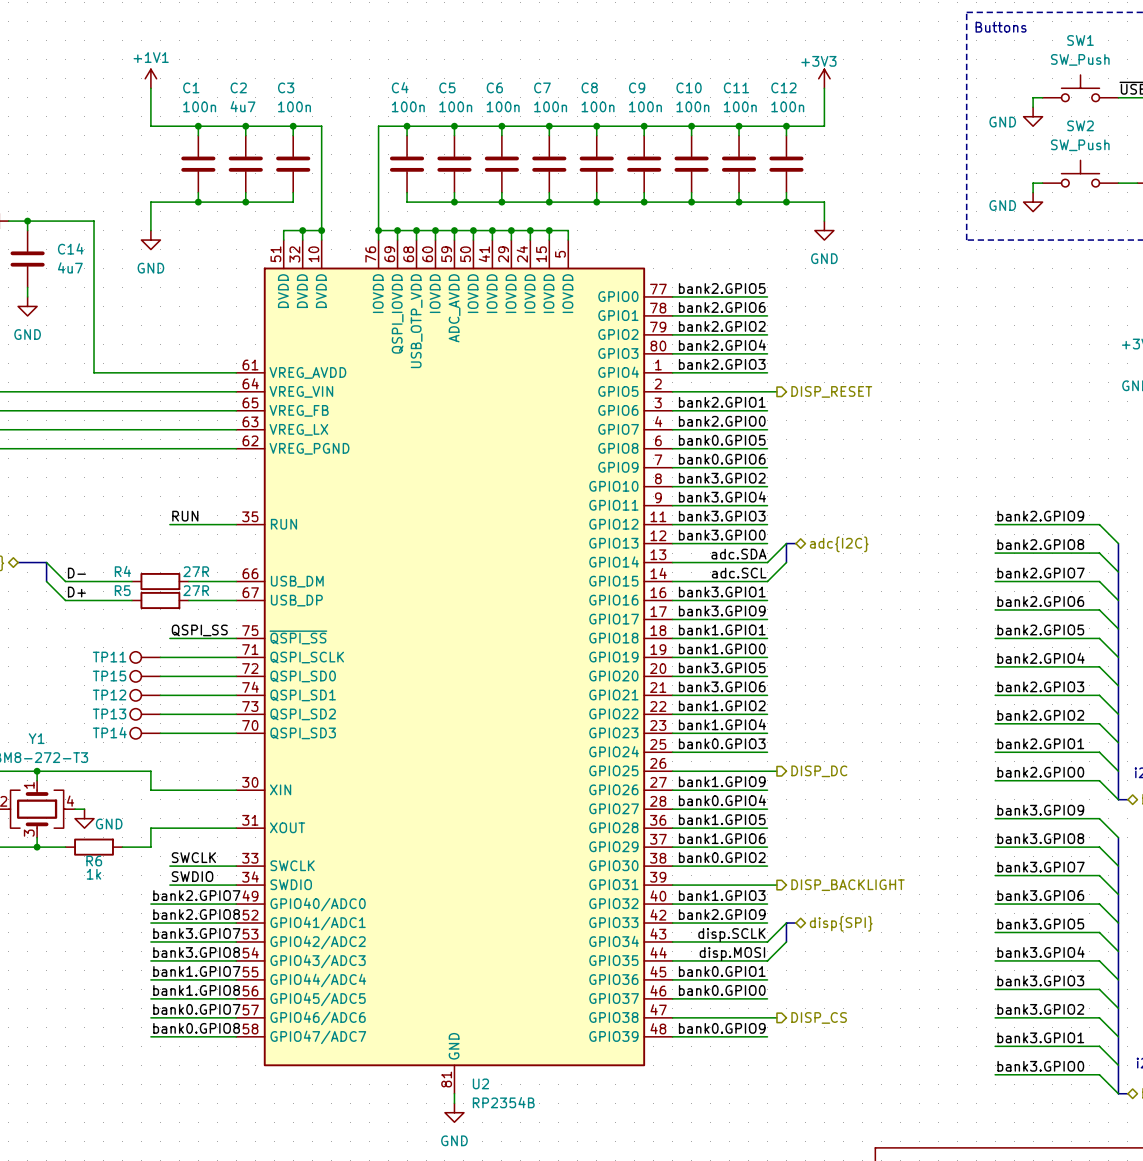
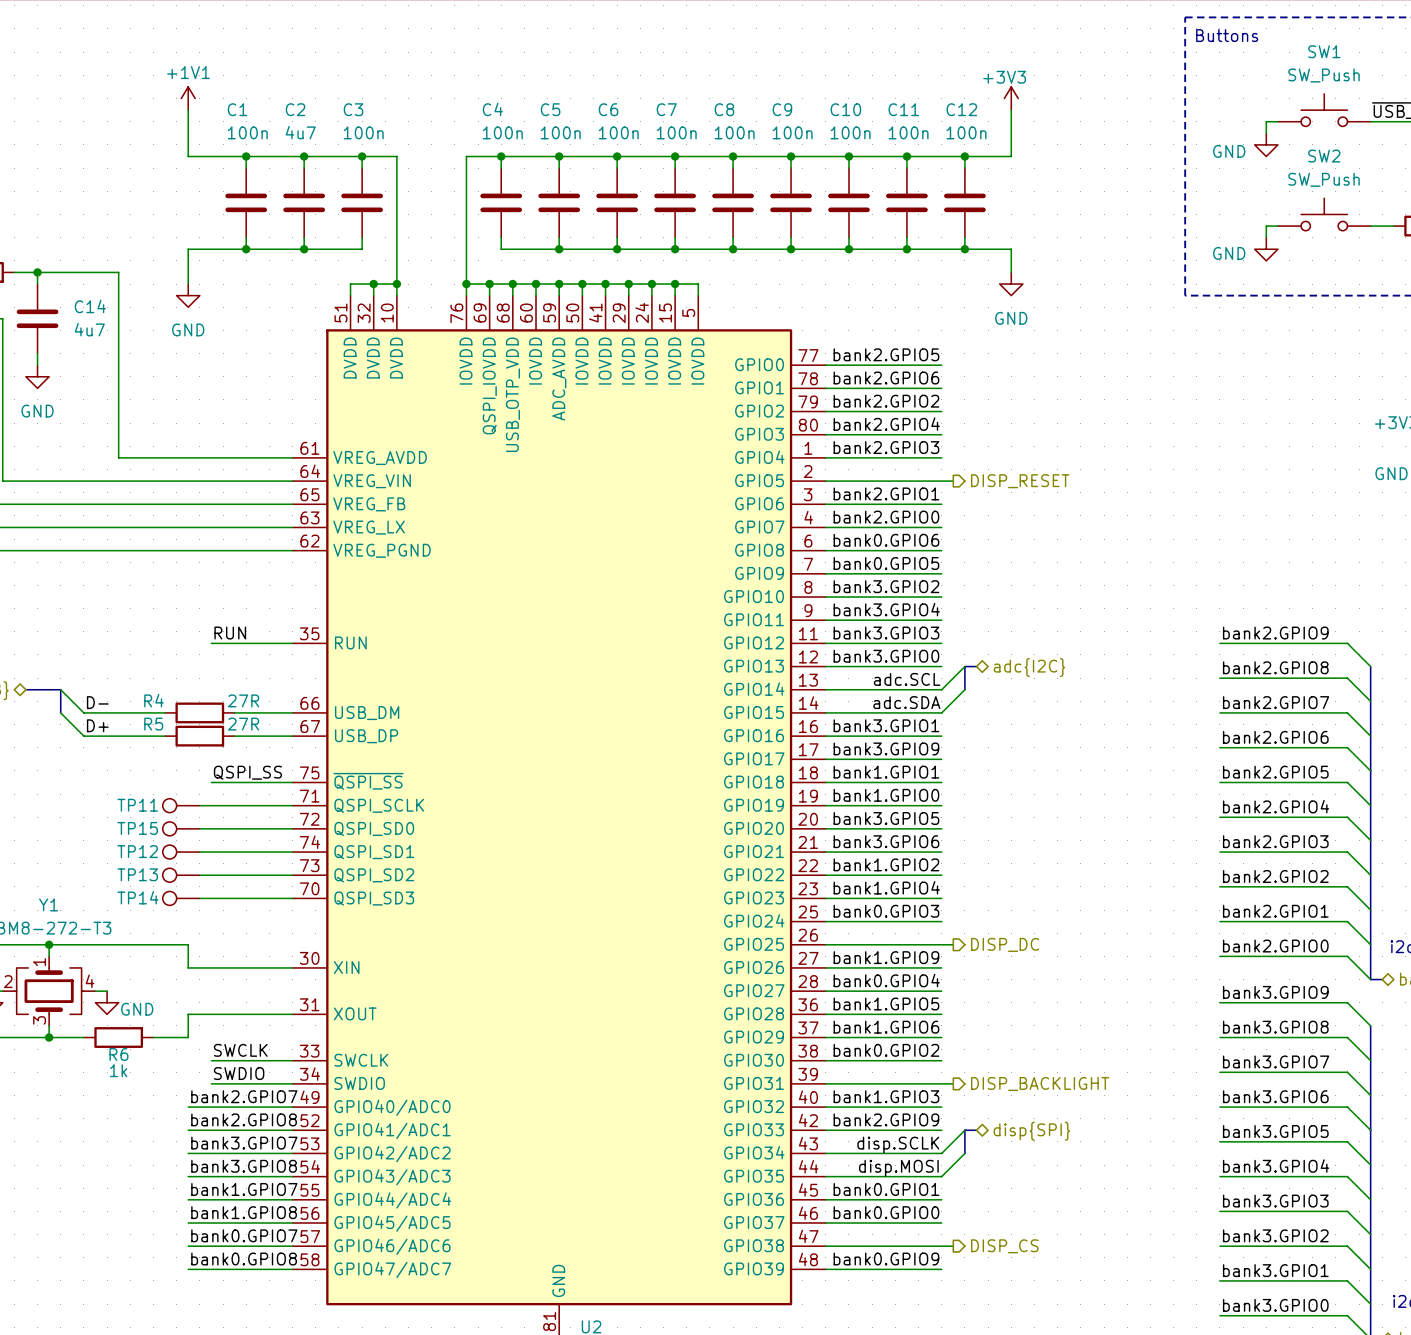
label: bank0.GPIO5 (722, 440) -> bank0.GPIO6 (886, 540)
label: bank0.GPIO6 (722, 459) -> bank0.GPIO5 (886, 563)
label: adc.SDA (738, 554) -> adc.SCL (907, 679)
label: adc.SCL (739, 573) -> adc.SDA (906, 702)

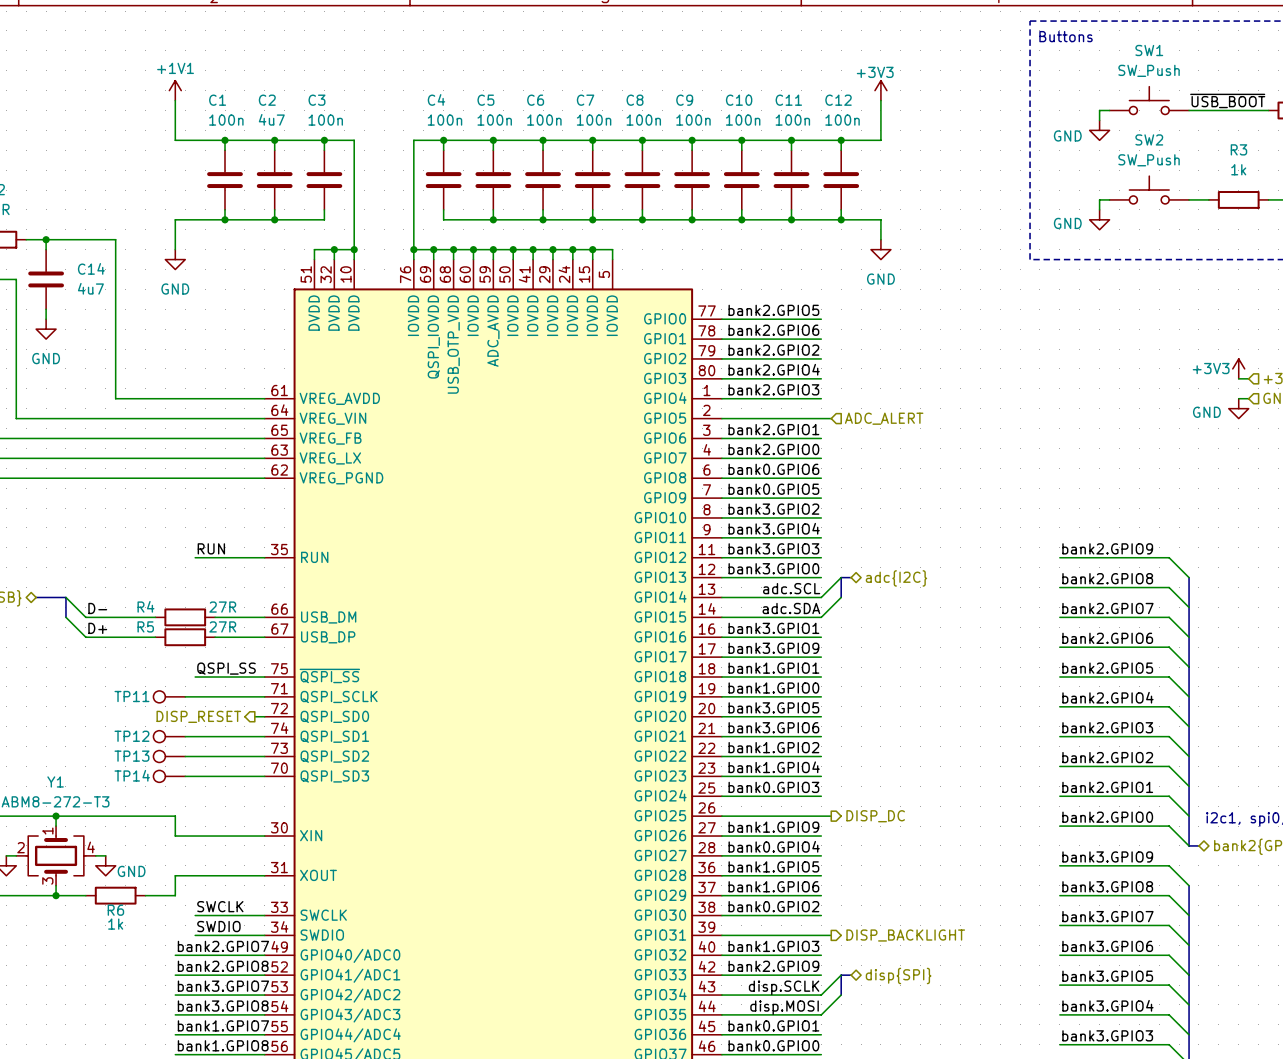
hierarchical label shape: output (1020, 481) -> input (884, 418)
hierarchical label: DISP_RESET (1020, 481) -> ADC_ALERT (884, 418)
TP15: (181, 828) -> none
wire: (199, 828) (280, 828) -> none
hierarchical label: none -> DISP_RESET (198, 716)

